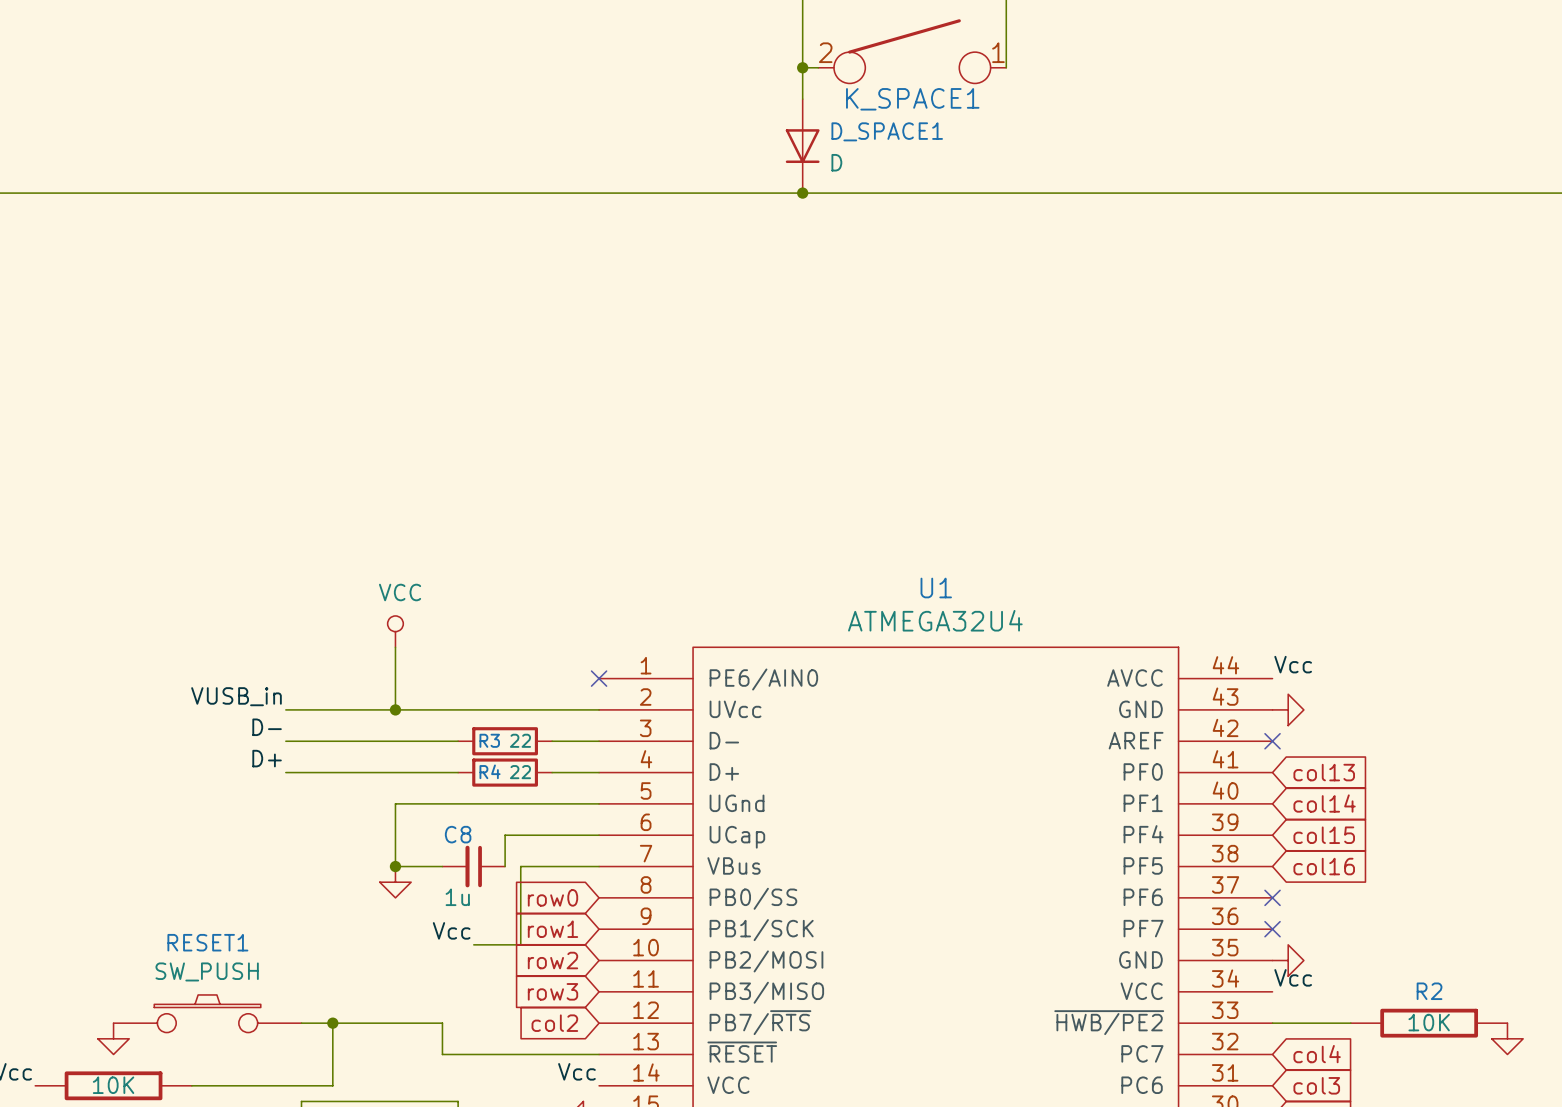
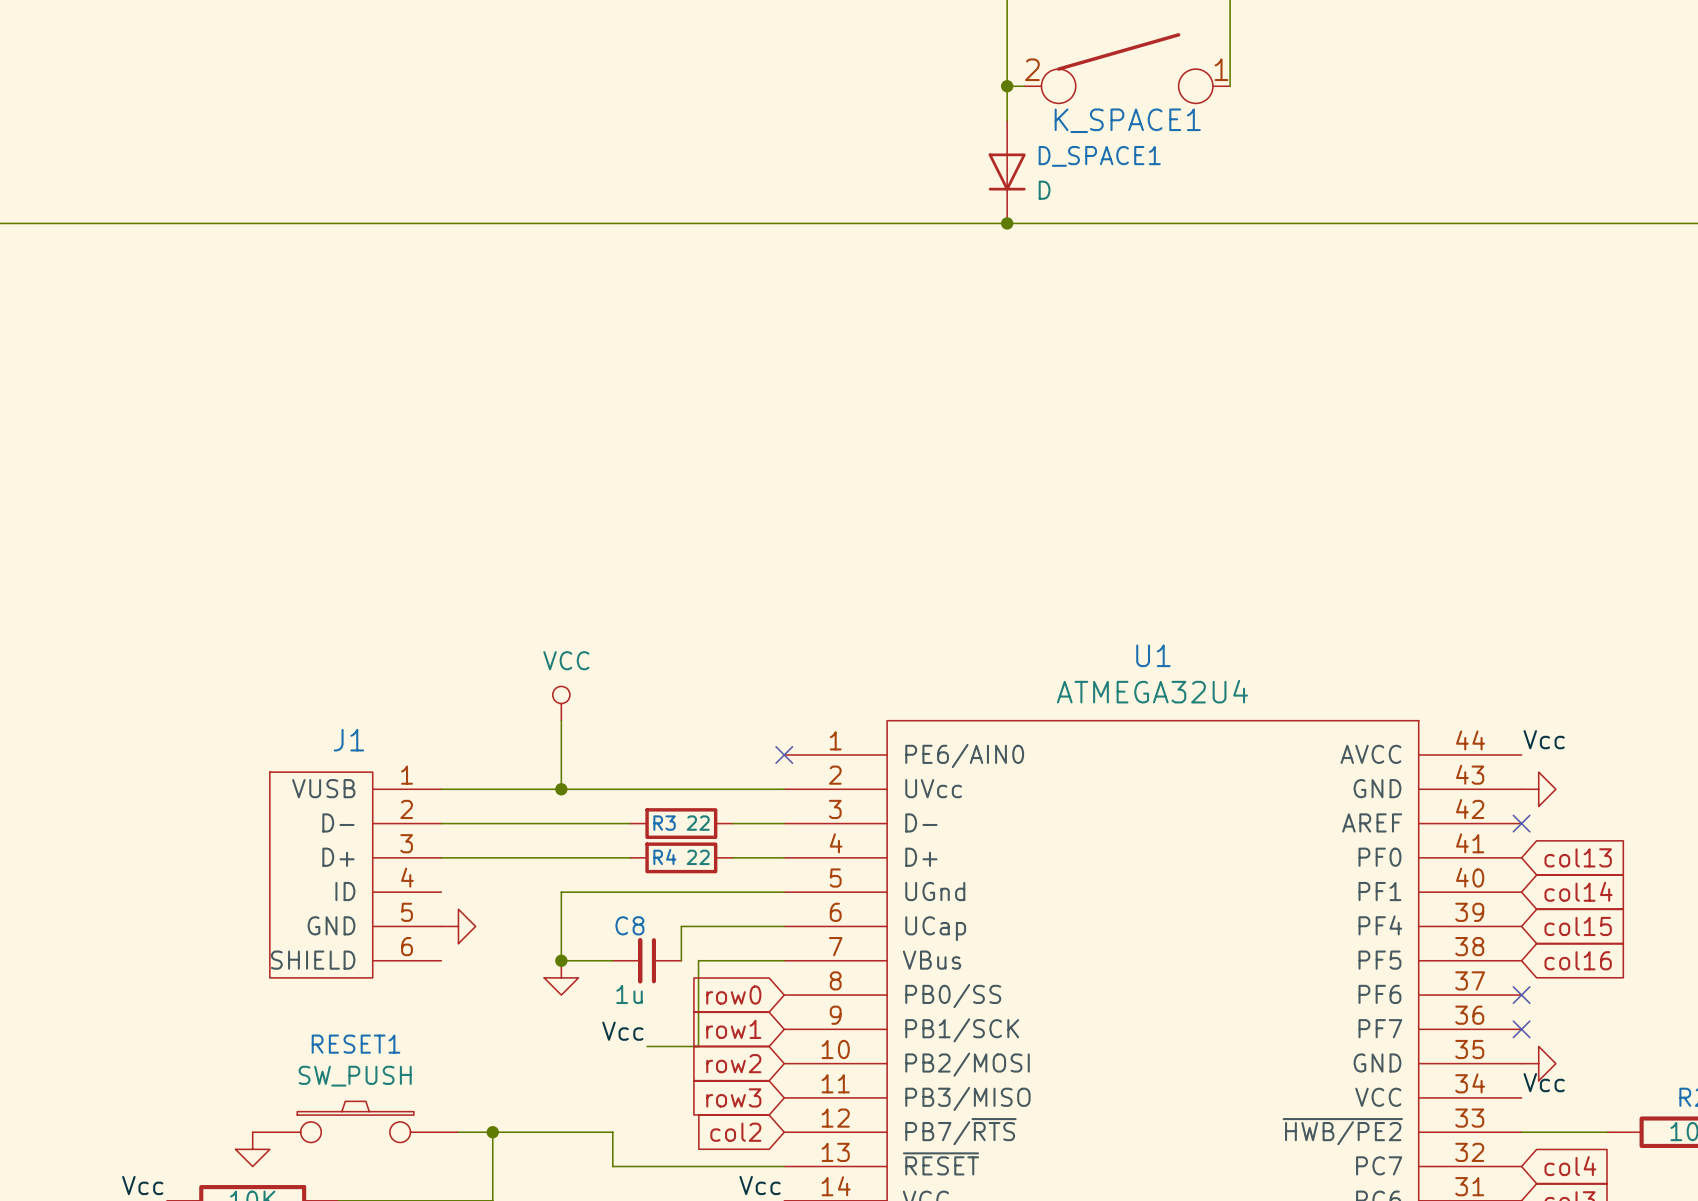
label: VUSB_in (236, 696) -> none
label: D- (267, 727) -> none
label: D+ (267, 758) -> none
J1: none -> (355, 875)
power symbol: none -> (458, 926)

